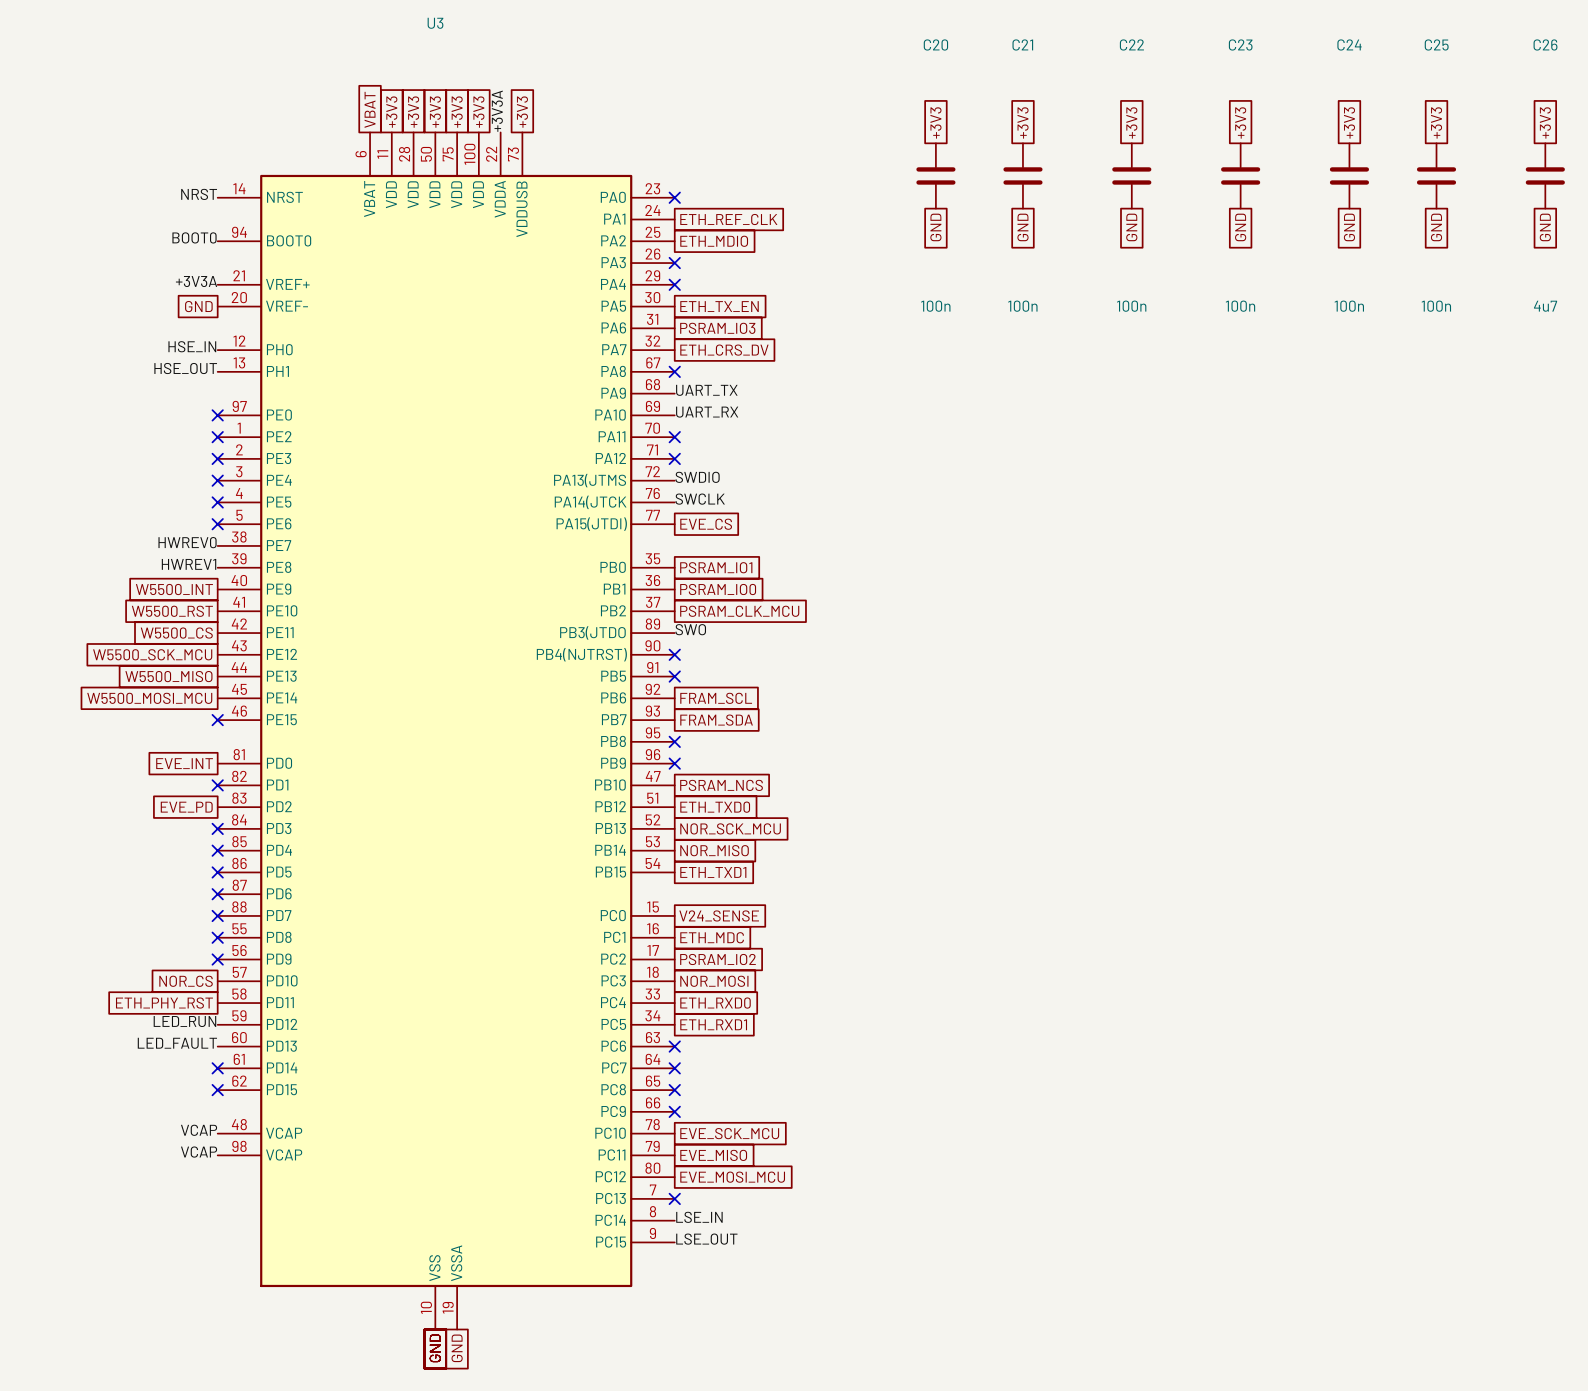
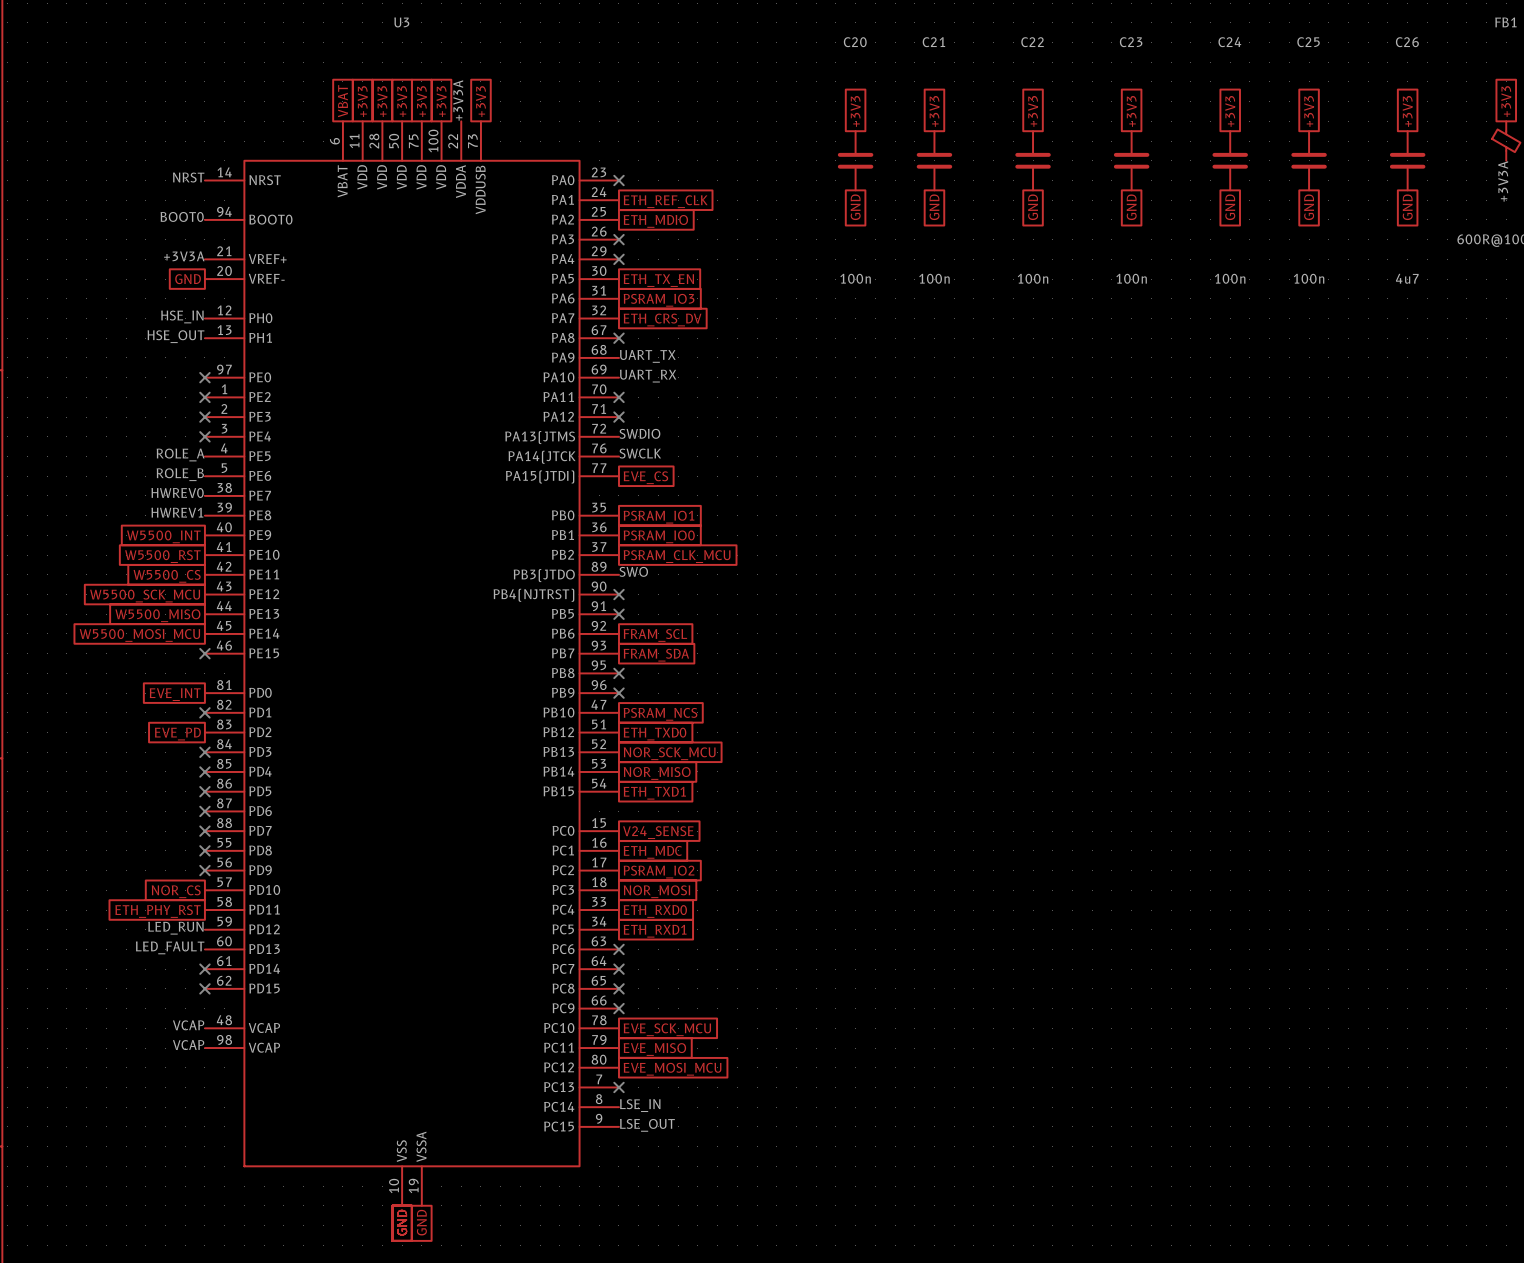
label: none -> ROLE_A (180, 454)
no-connect mark: (217, 502) -> none
label: none -> ROLE_B (180, 474)
no-connect mark: (217, 524) -> none

